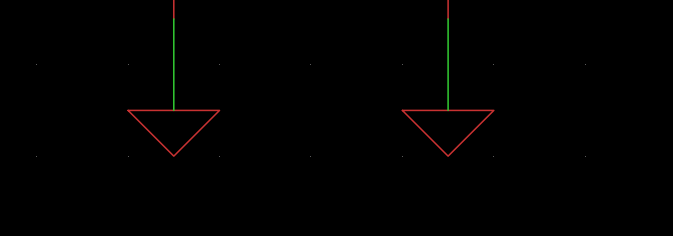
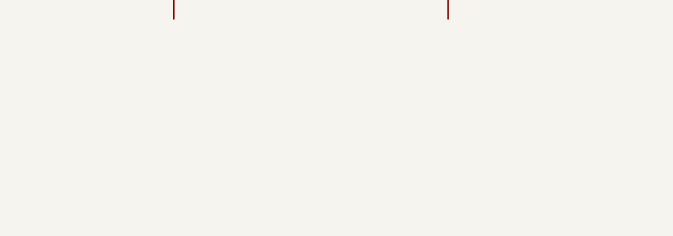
wire: (173, 18) (173, 110) -> none
wire: (448, 18) (448, 110) -> none
power symbol: (173, 133) -> none
power symbol: (448, 133) -> none

